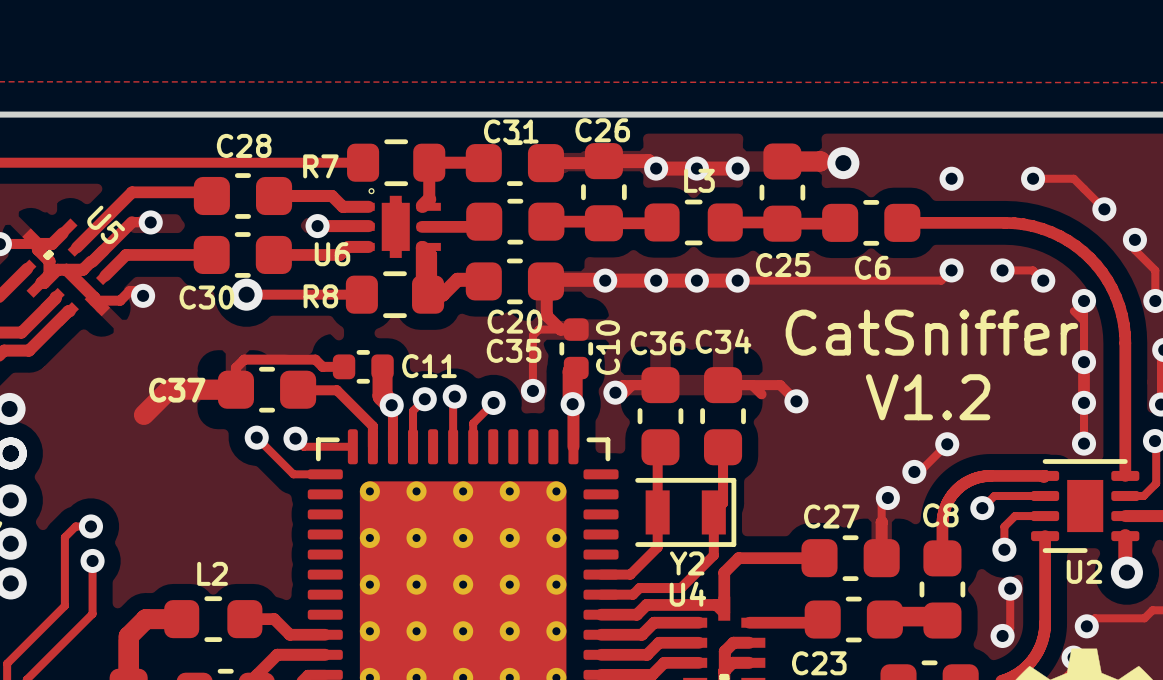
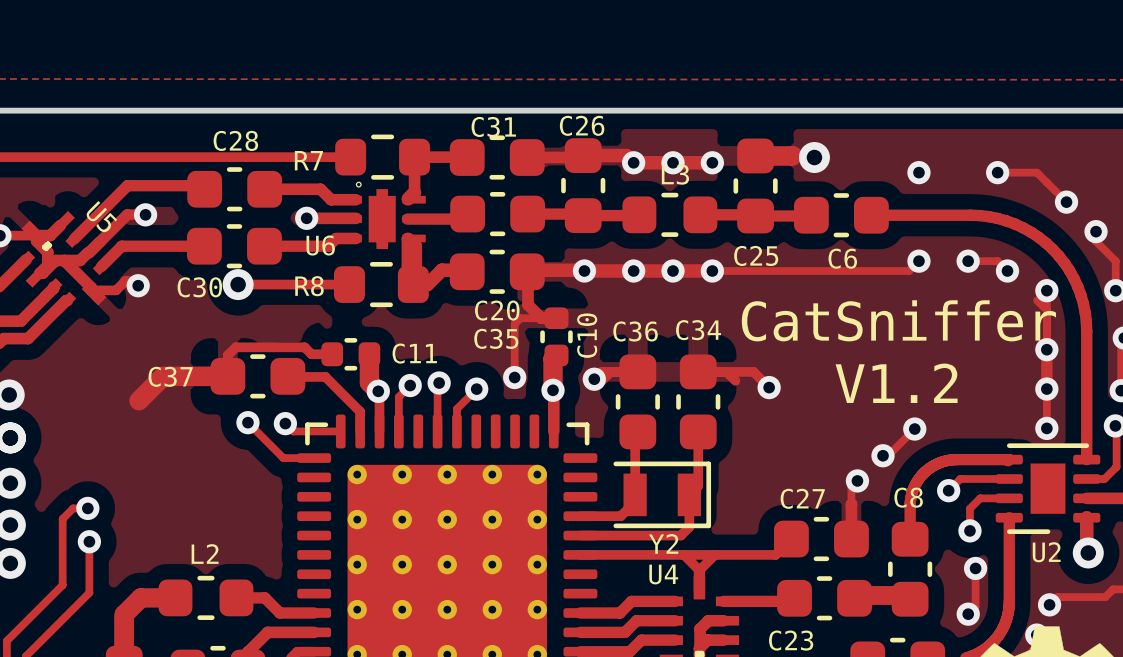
track: (657, 519) (657, 547) (630, 574) -> (635, 501) (620, 516) (580, 516)
track: (713, 545) (713, 555) (681, 588) (639, 588) (633, 594) (601, 594) -> (689, 527) (680, 535) (580, 535)
track: (819, 558) (738, 558) (724, 572) (724, 590) -> (791, 539) (775, 554) (608, 554)
track: none -> (683, 554) (699, 570) (714, 554)
track: (724, 612) (716, 604) (646, 604) (636, 614) (601, 614) -> none

